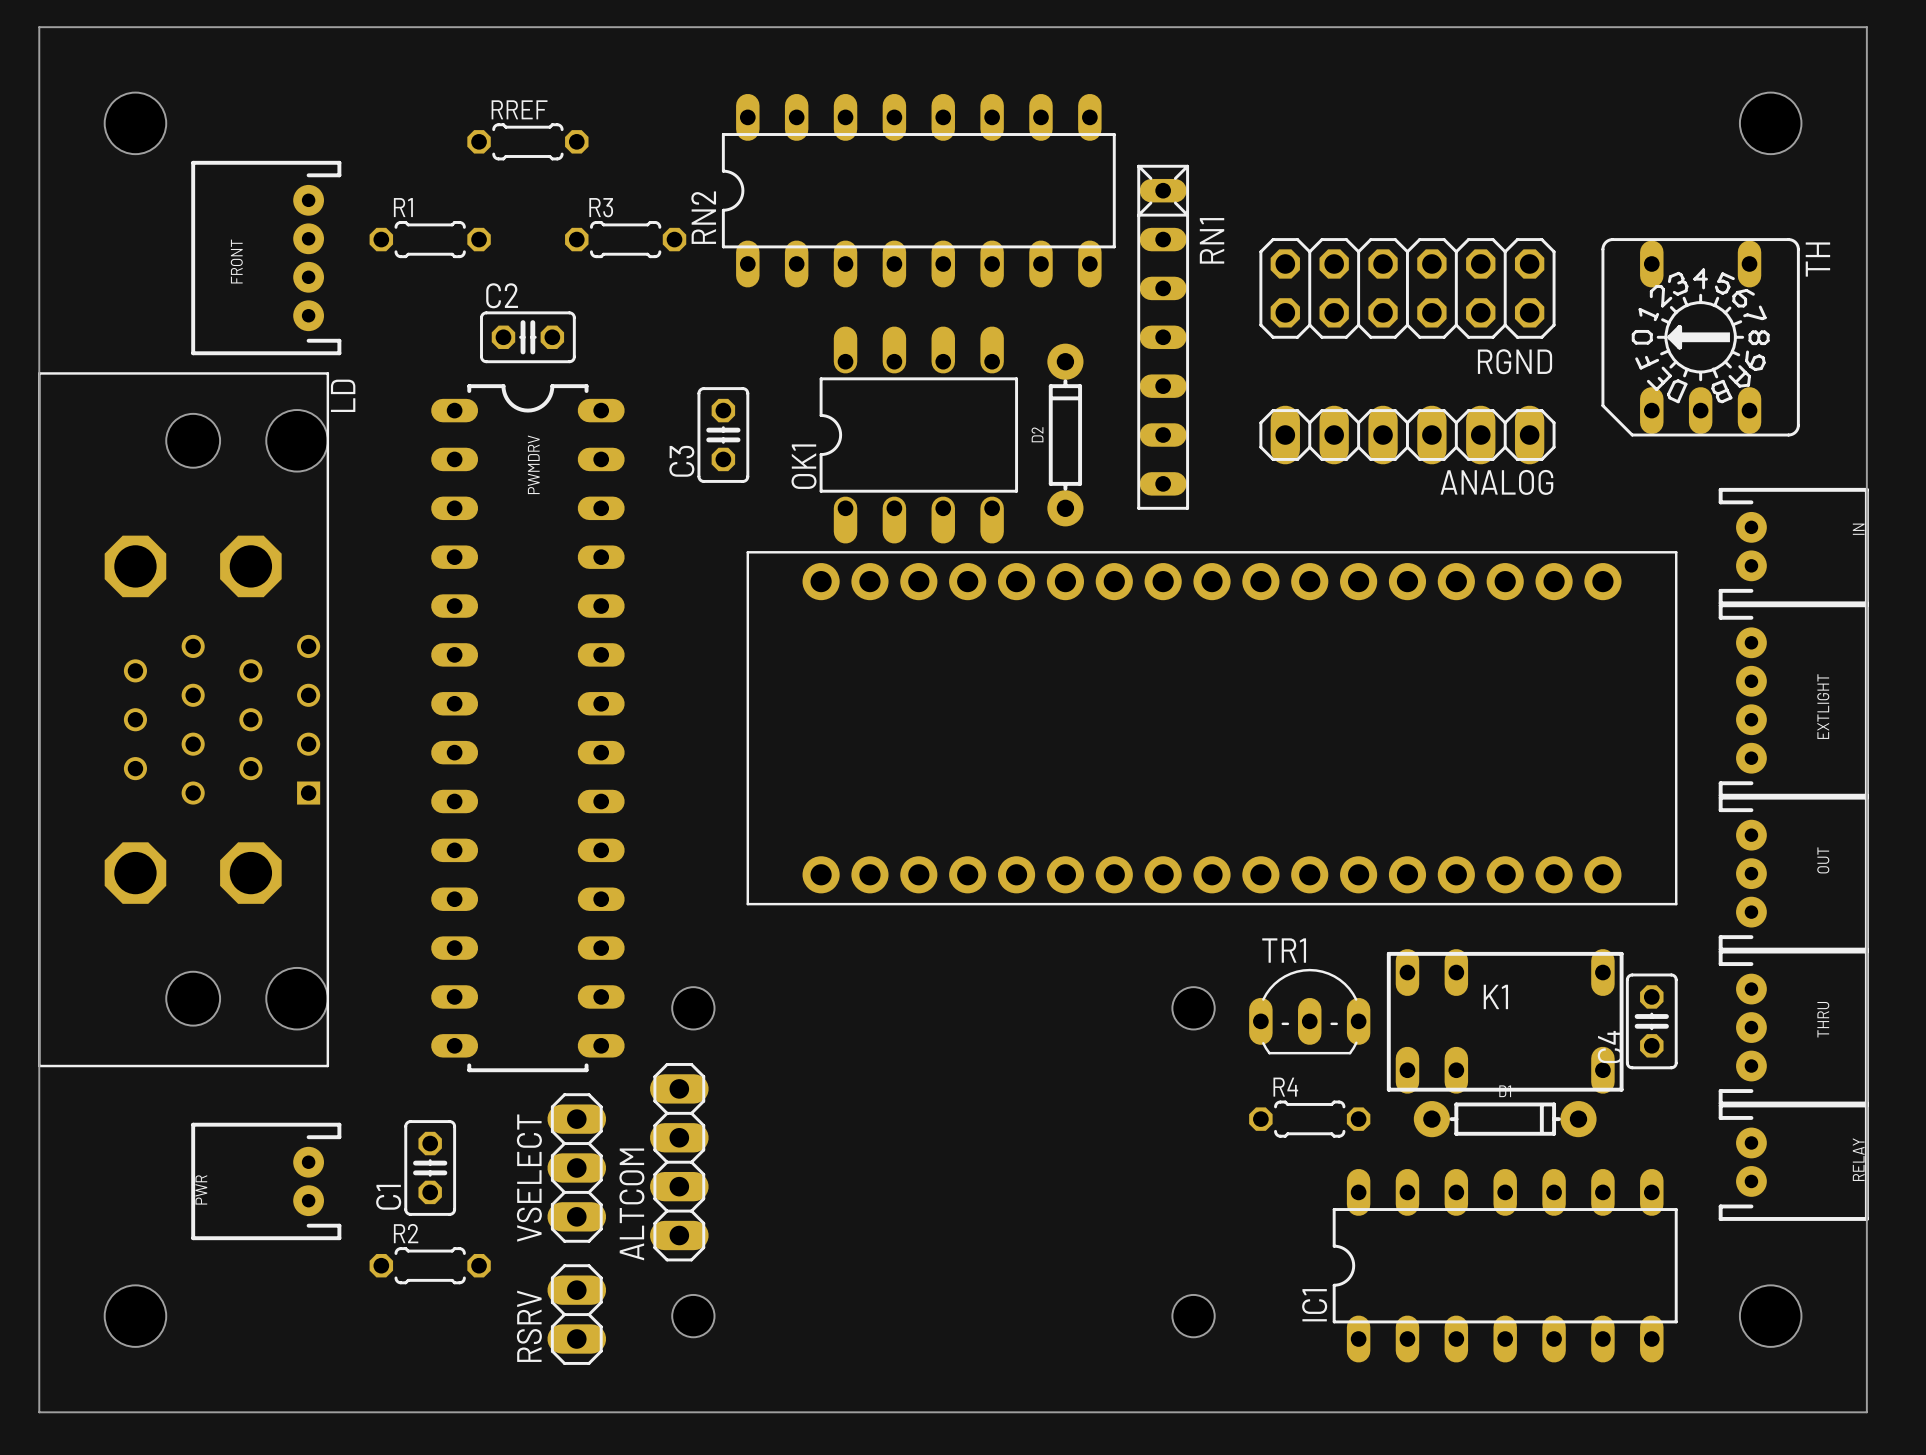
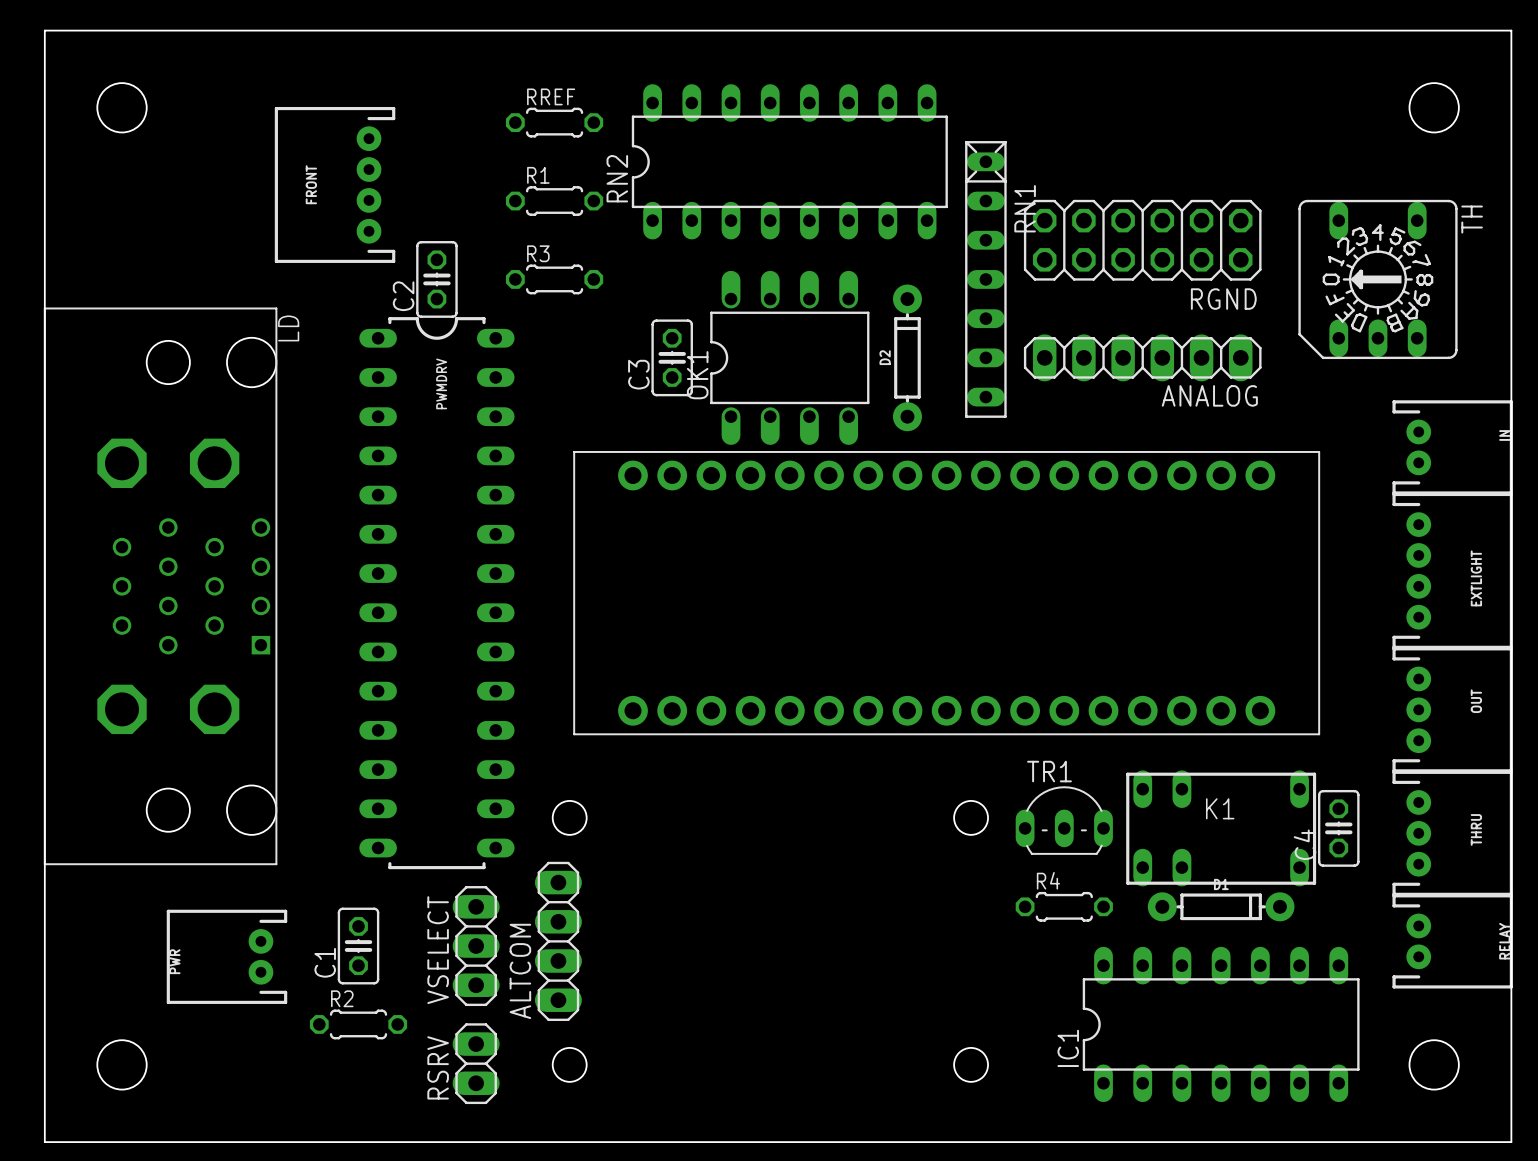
RREF position: (527, 141) -> (554, 122)
RN2 position: (918, 190) -> (789, 161)
R1 position: (430, 239) -> (554, 201)
R3 position: (625, 239) -> (554, 279)
FRONT position: (266, 258) -> (335, 184)
C2 name position: C2 (502, 295) -> C2 (403, 296)
C2 rotation: 0° (527, 337) -> 90° clockwise (436, 279)
RN1 position: (1163, 337) -> (985, 279)
C3 position: (723, 435) -> (672, 357)
OK1 position: (918, 435) -> (789, 357)
D2 position: (1065, 435) -> (907, 357)
part position: (1212, 728) -> (946, 593)

